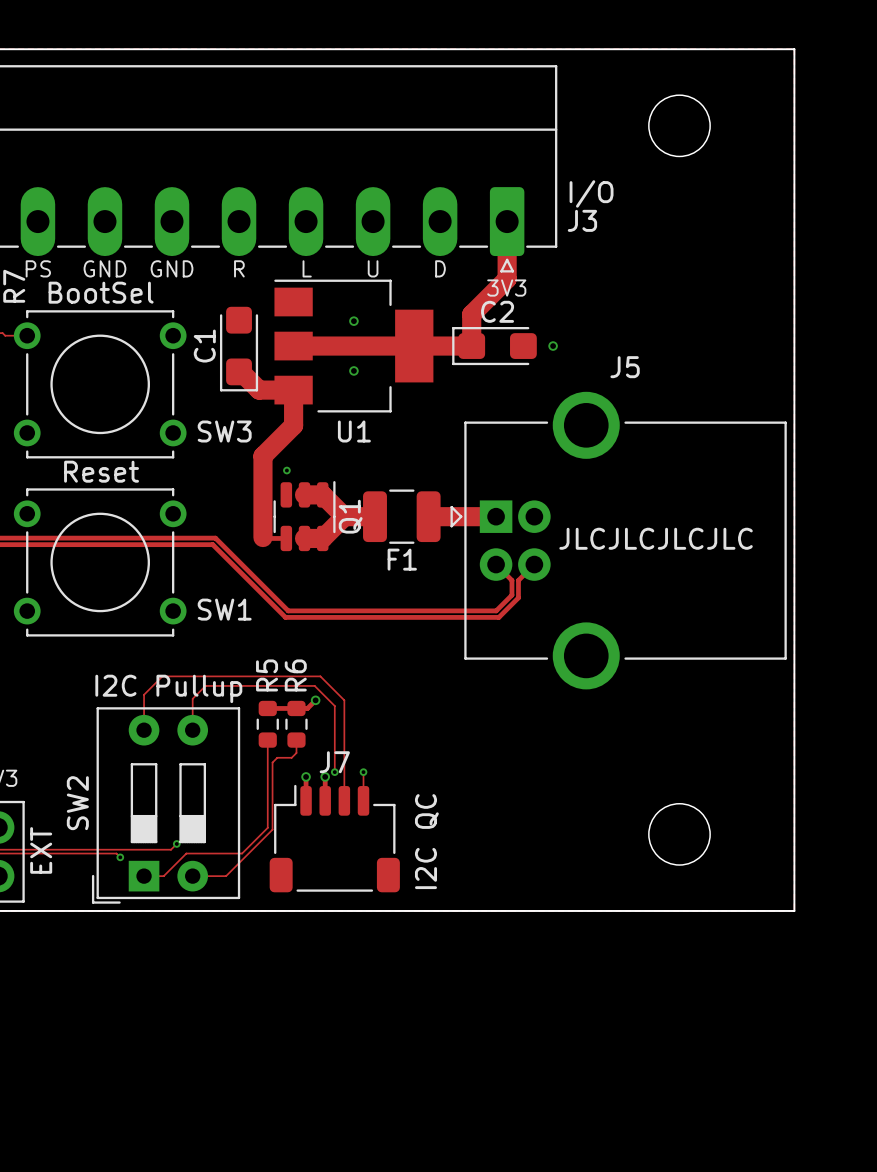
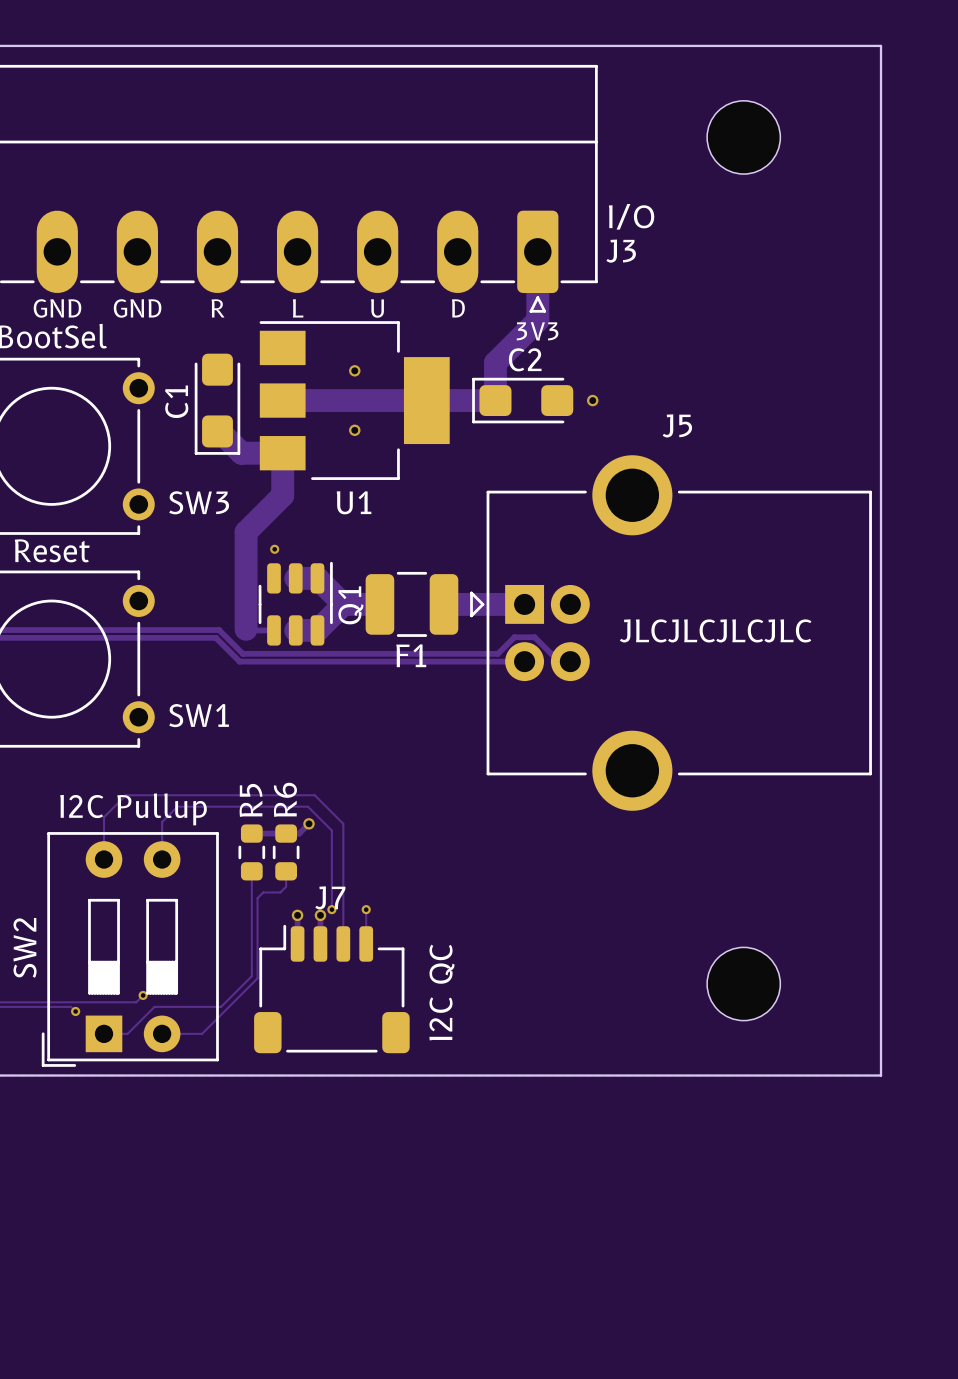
track: (215, 538) (288, 610) (496, 610) (511, 595) (511, 580) (496, 564) -> (186, 637) (215, 637) (239, 661) (524, 661)
track: none -> (189, 630) (219, 630) (242, 653) (497, 653) (514, 637) (534, 637) (551, 653) (562, 653)
track: (212, 544) (285, 617) (498, 617) (518, 597) (518, 580) (534, 564) -> none

